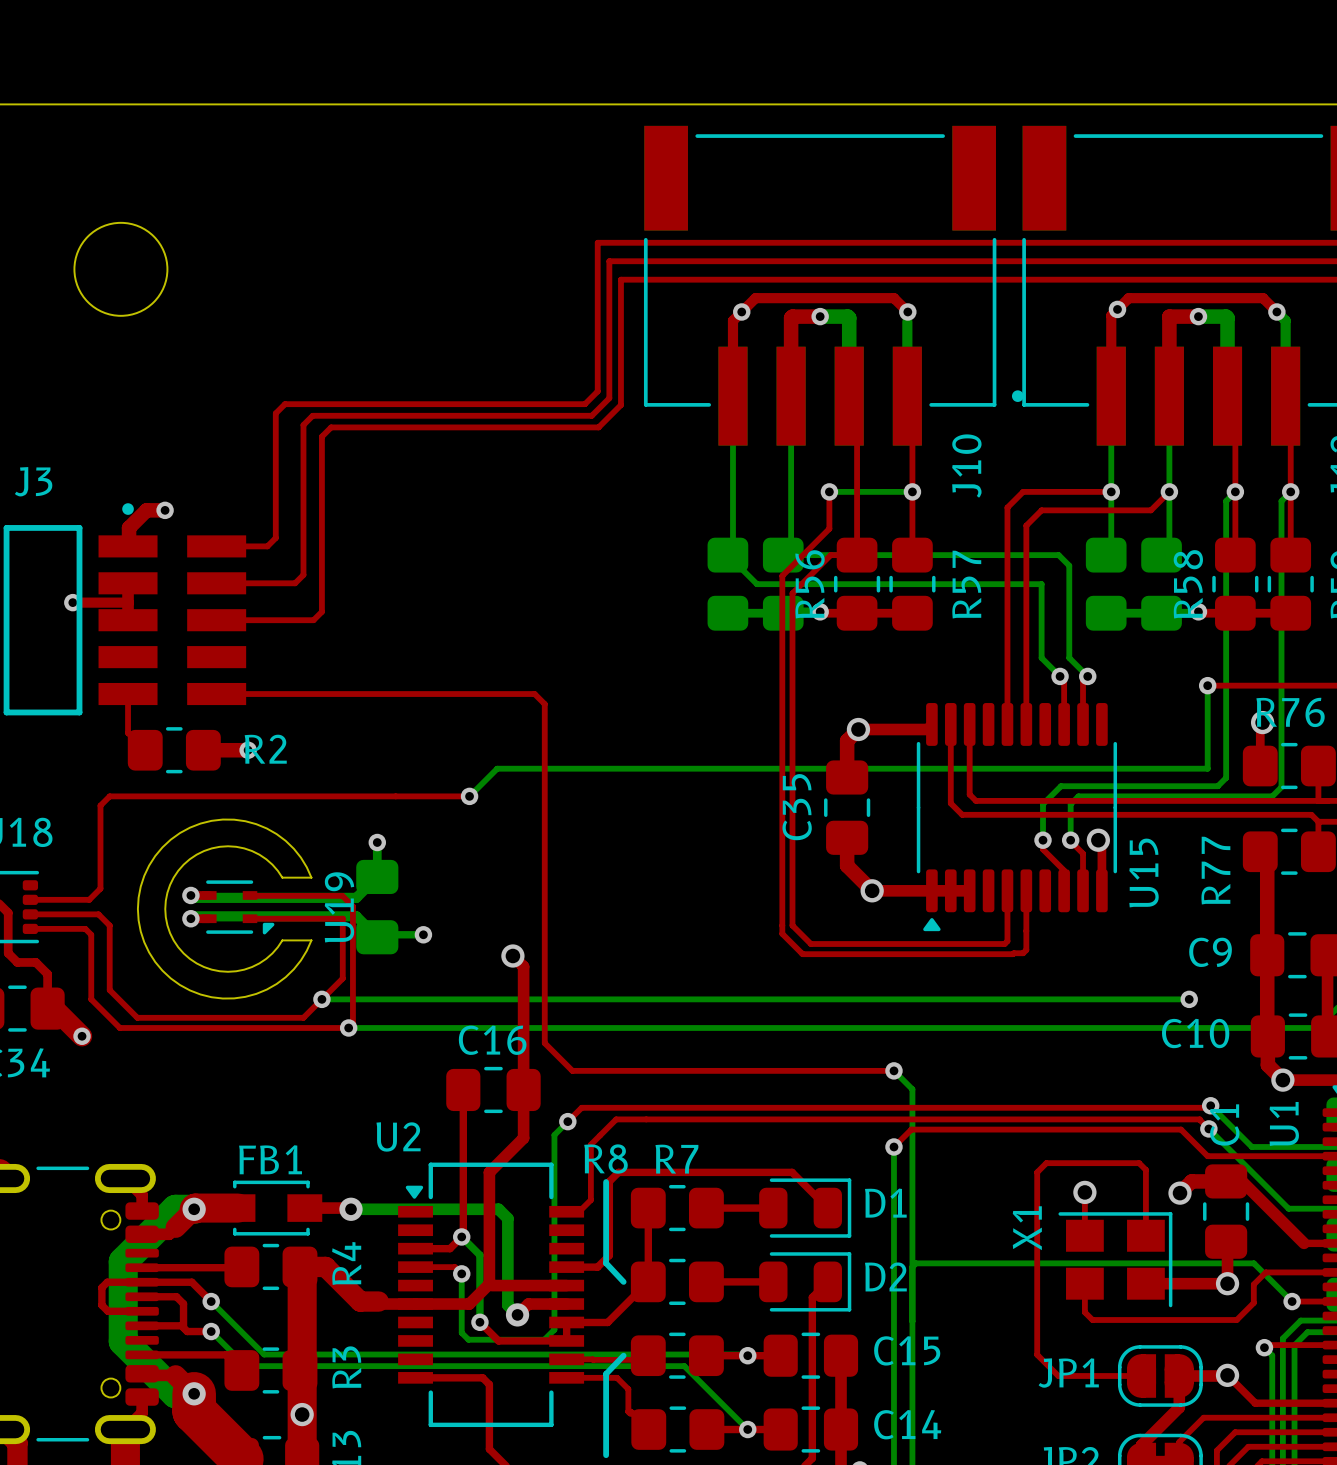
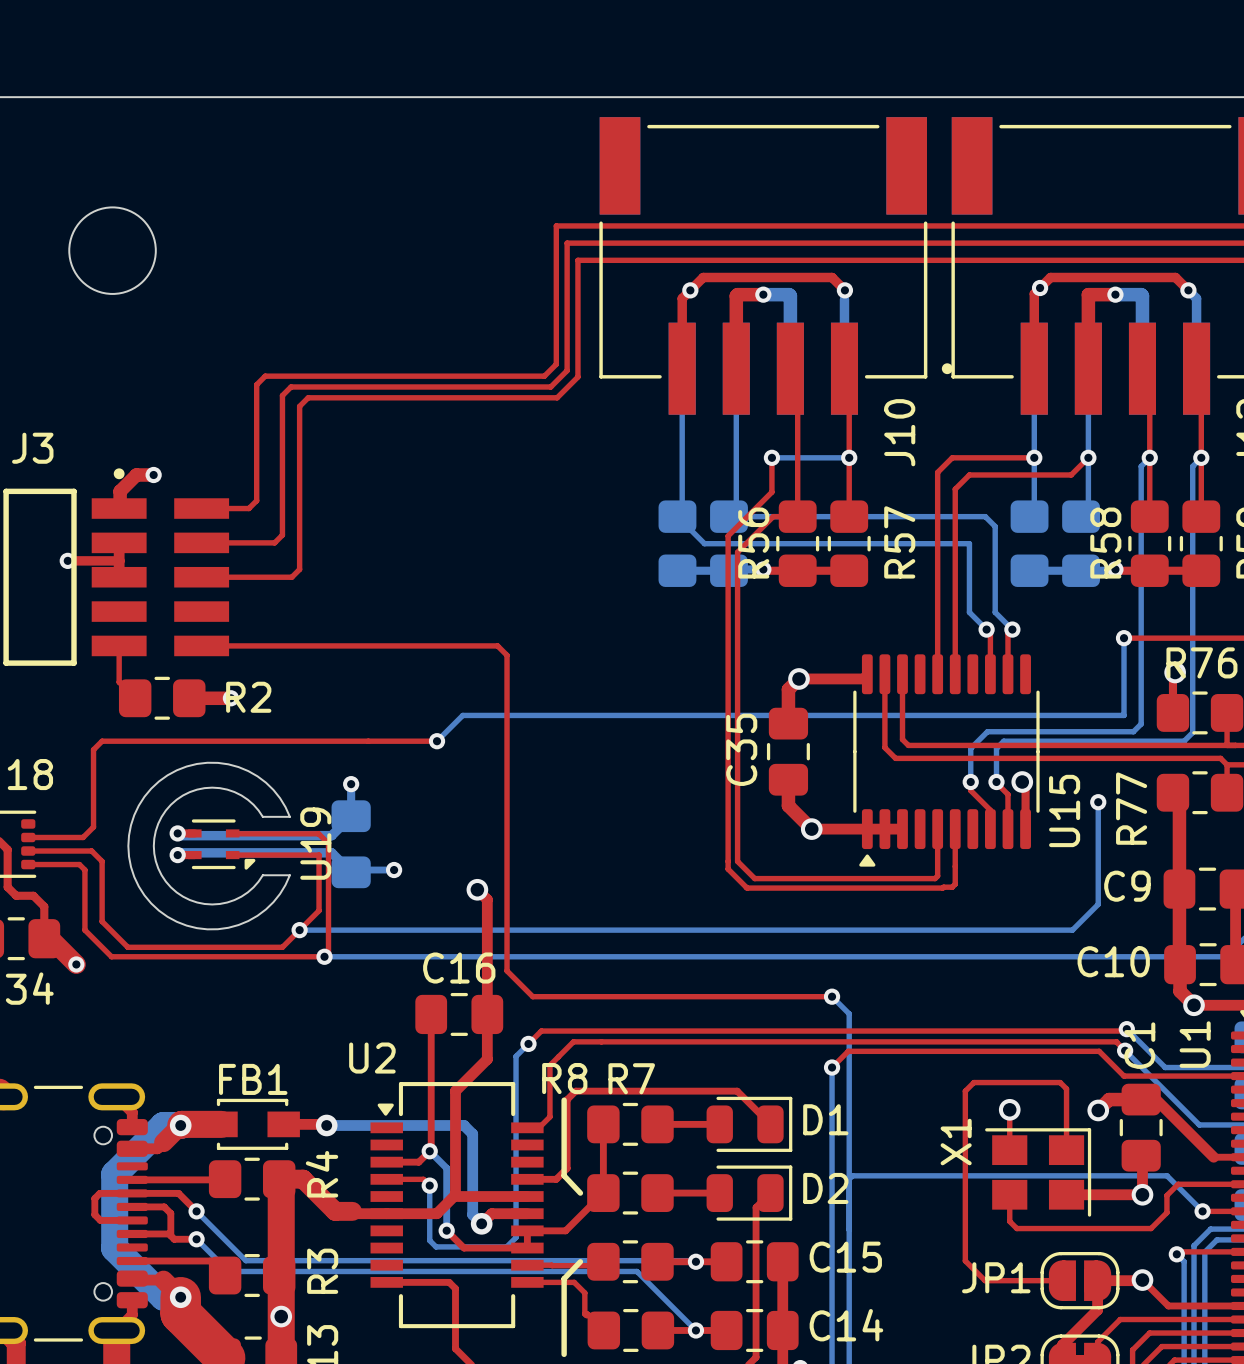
bottom track: (1152, 999) (1189, 999) -> (1072, 930) (1098, 904) (1098, 802)
via position: (1189, 999) -> (1098, 802)

